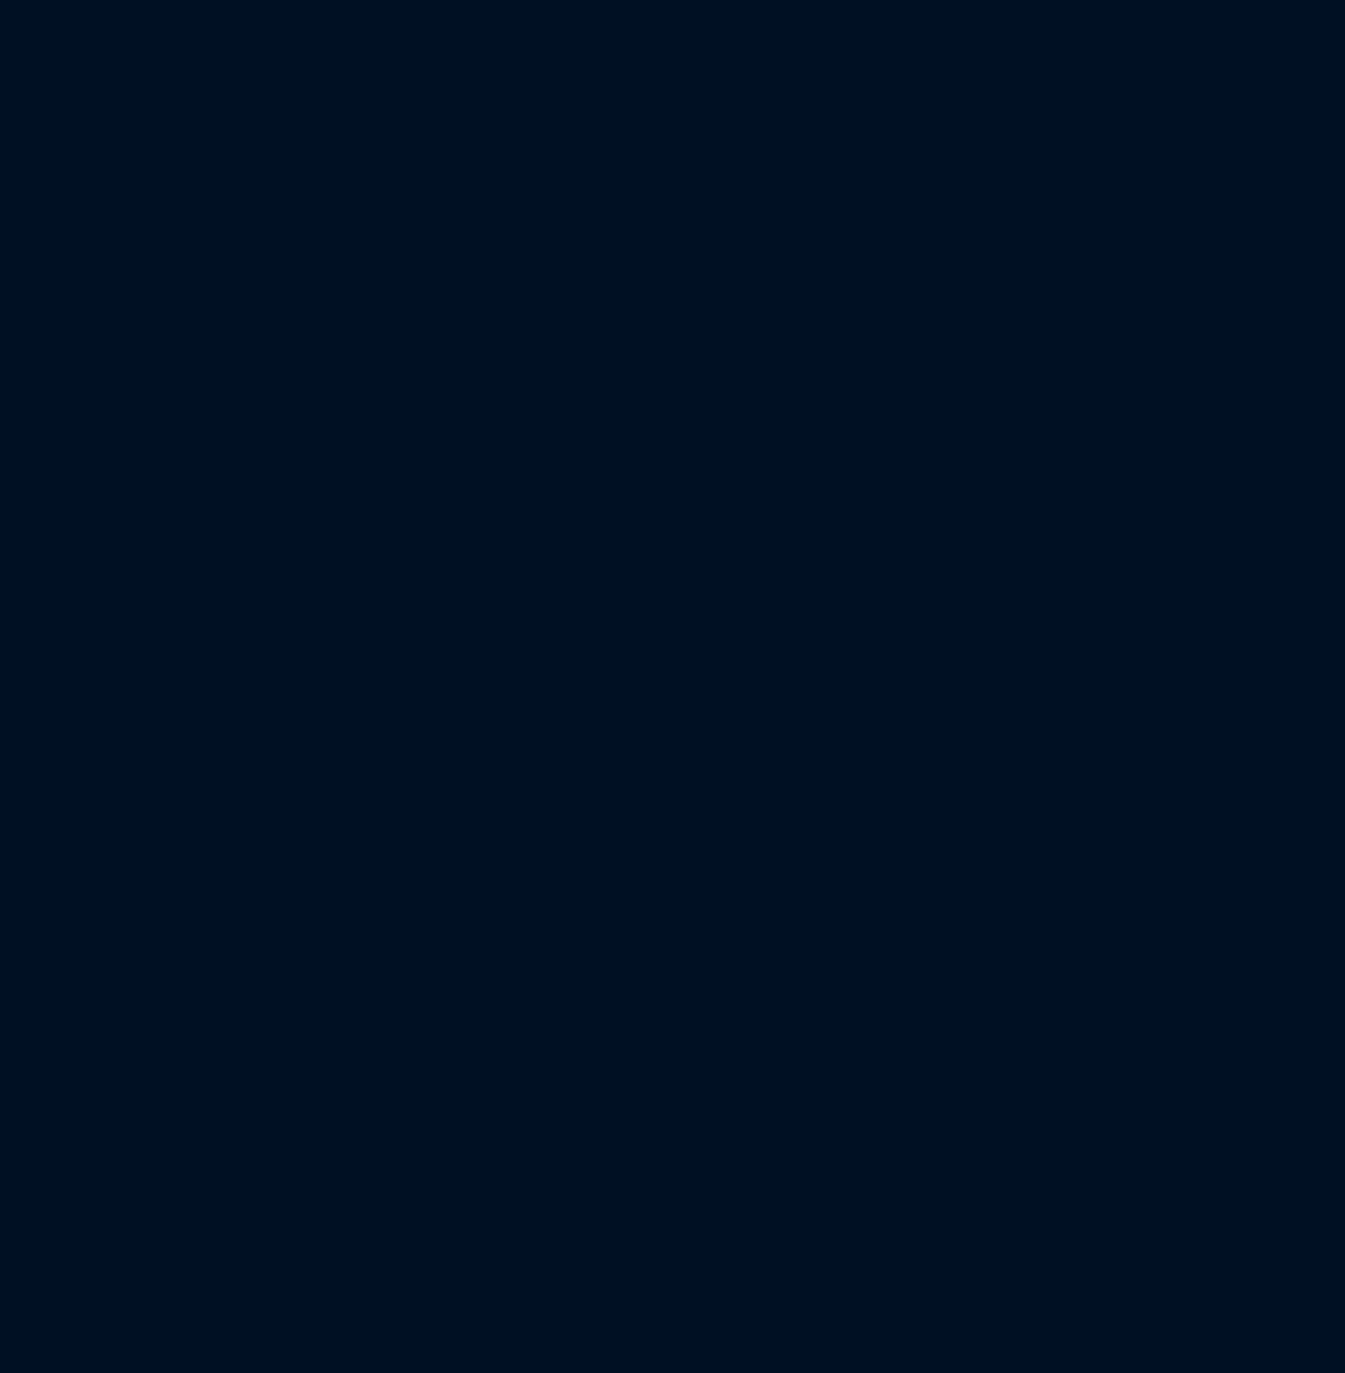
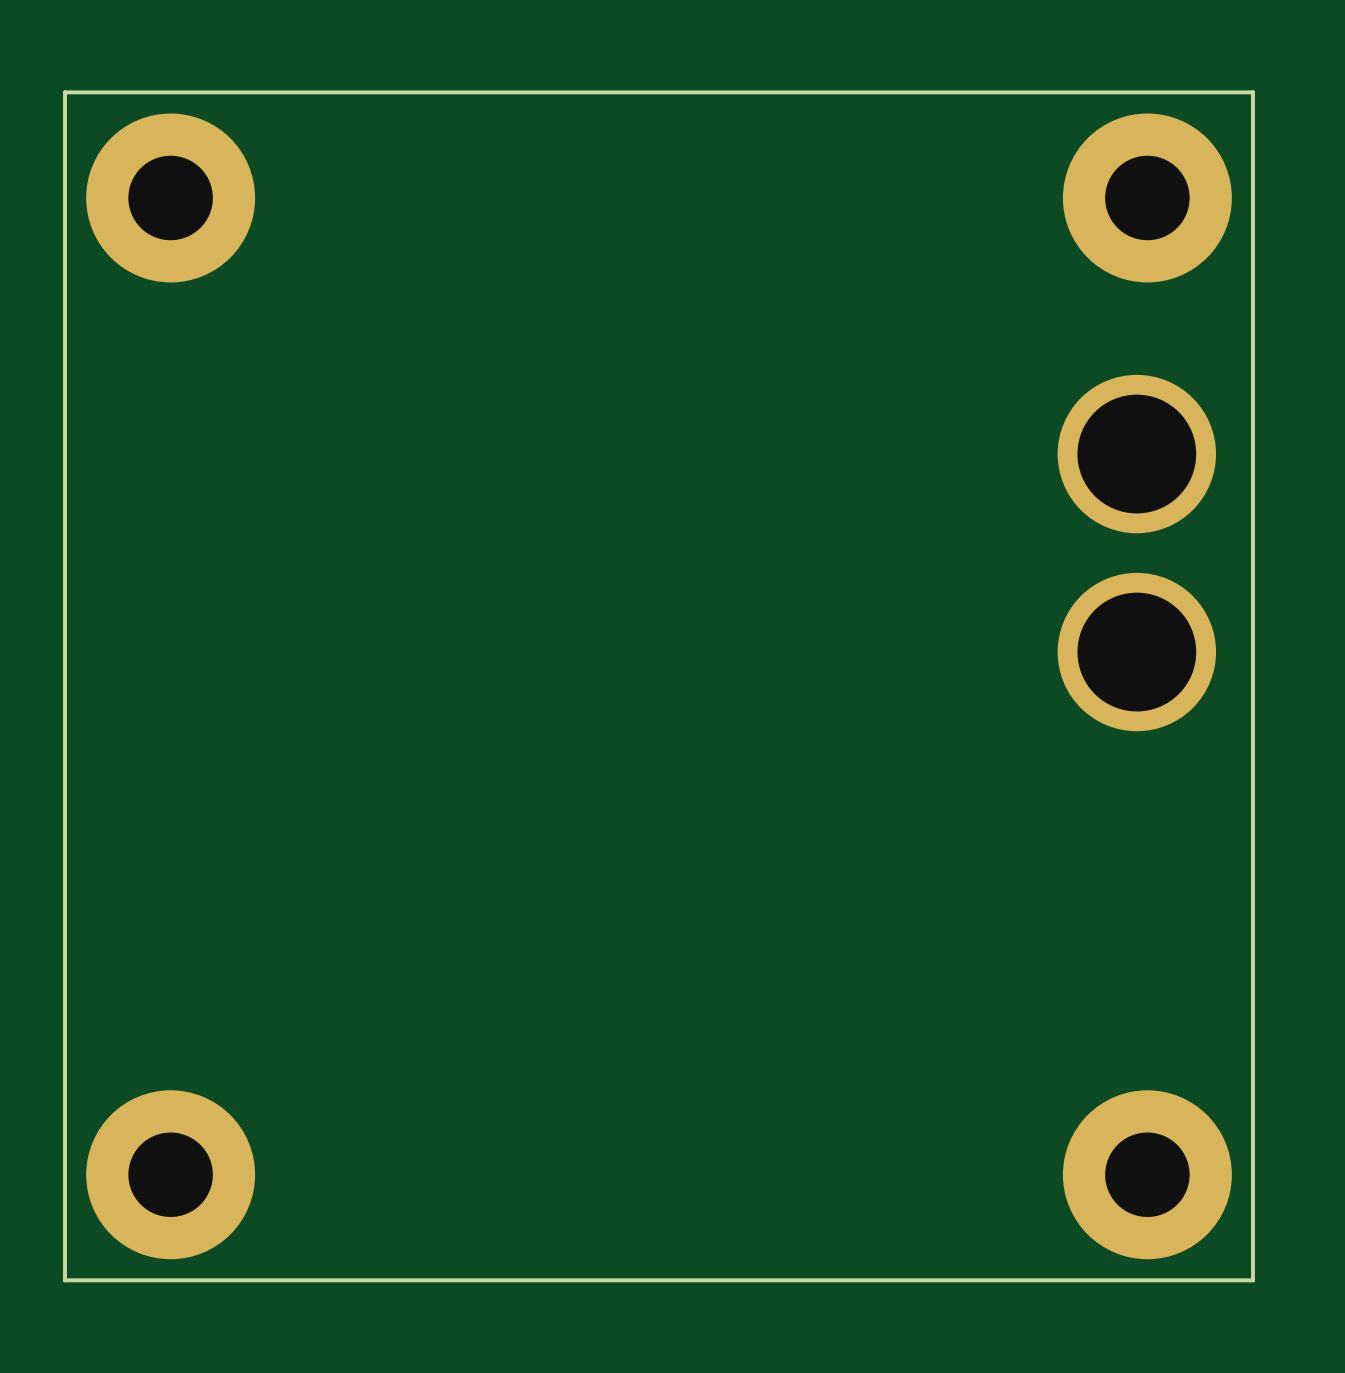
board edge: none -> (1252, 92) (1252, 1280) (65, 1280) (65, 92) (1252, 92)
part: none -> (170, 197)
part: none -> (1147, 197)
part: none -> (1136, 553)
part: none -> (170, 1174)
part: none -> (1147, 1174)

